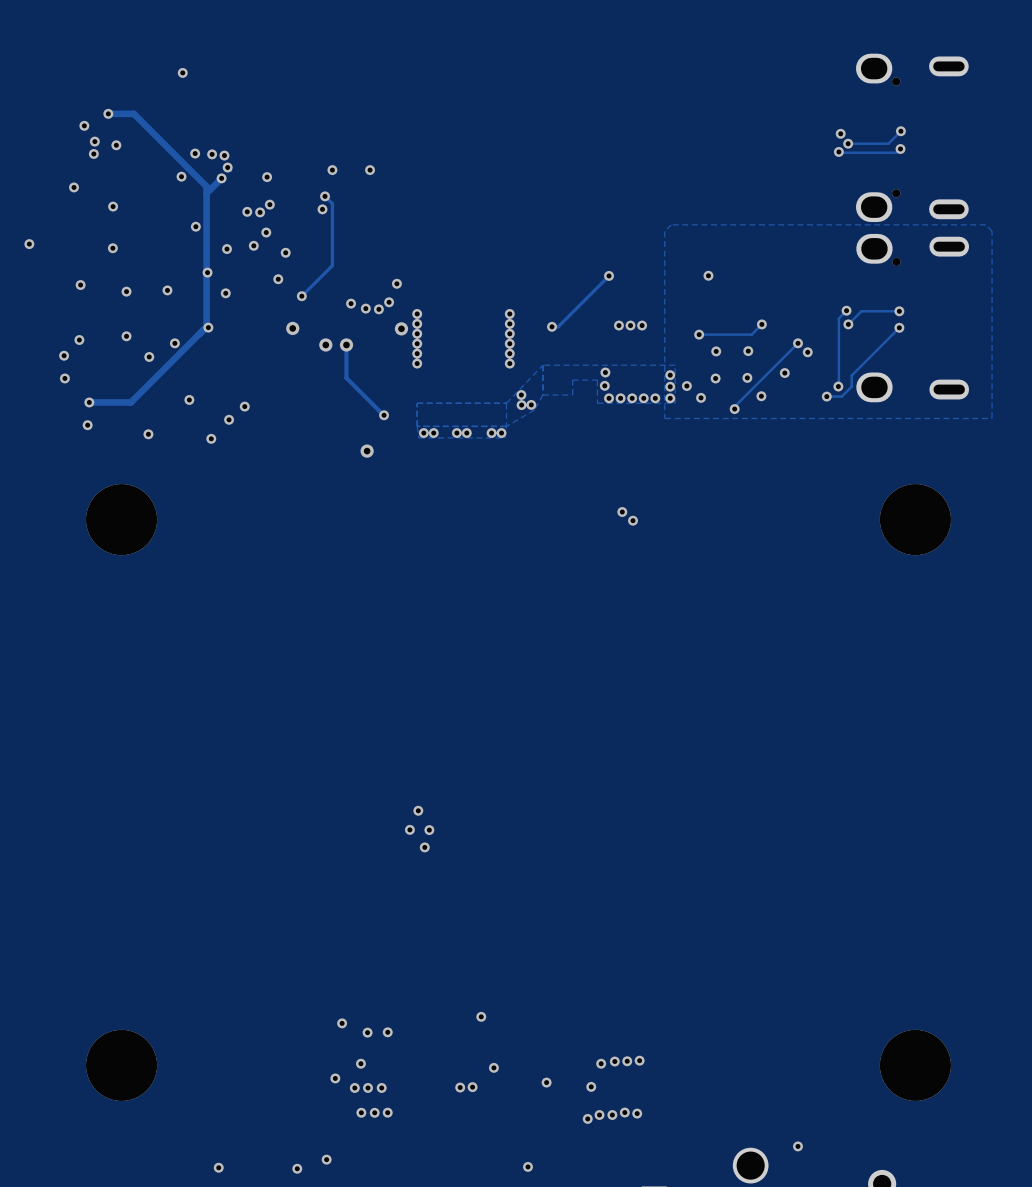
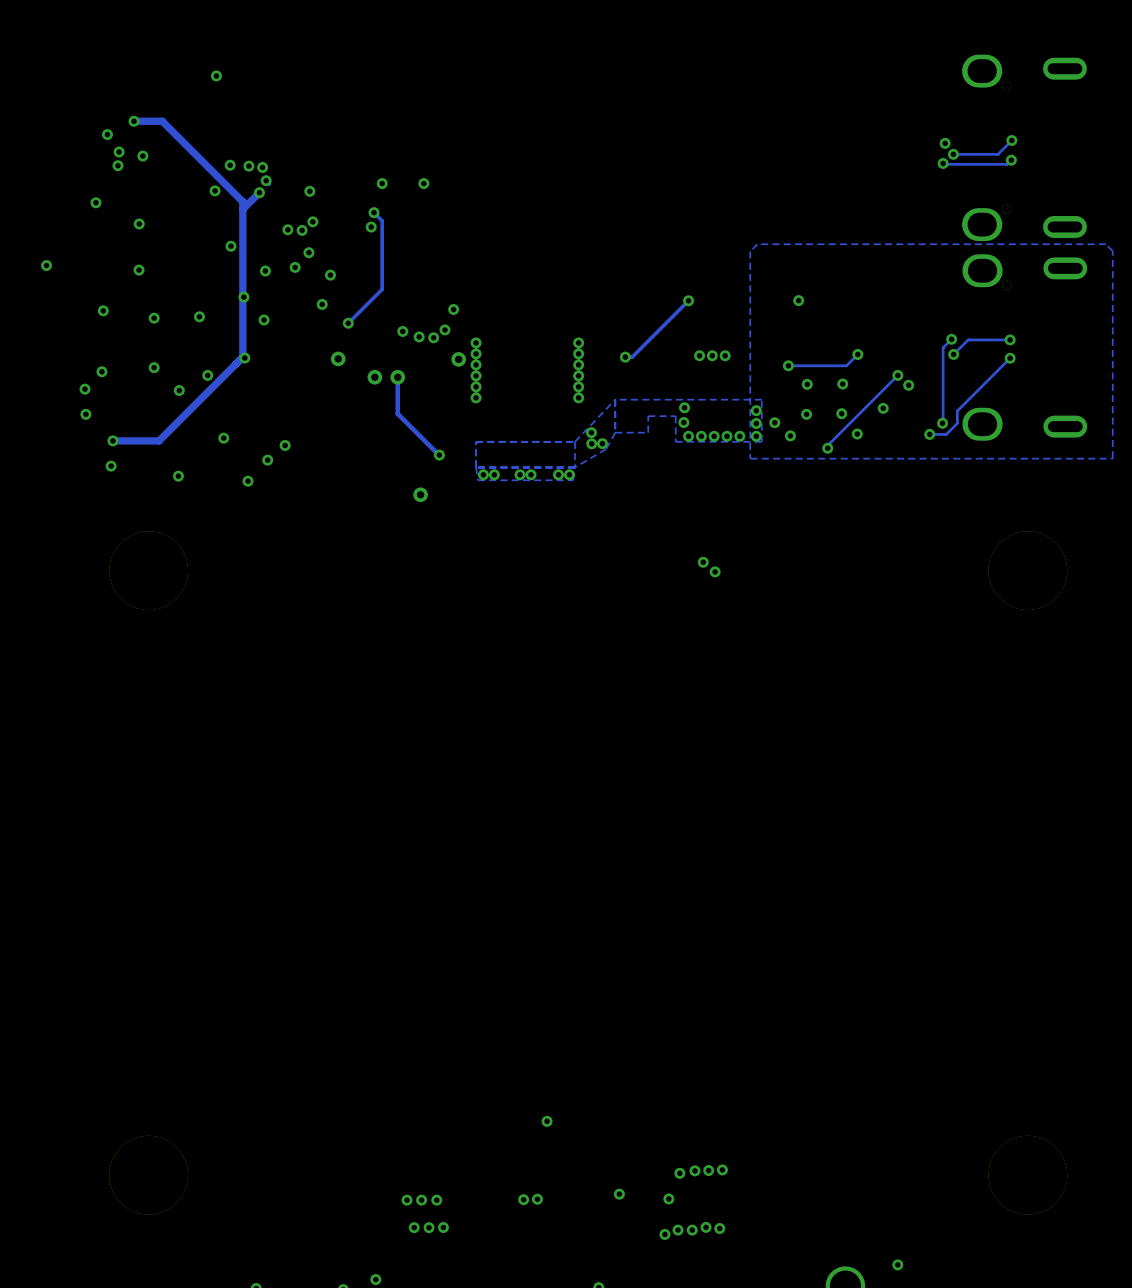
via: (418, 810) -> none
via: (409, 829) -> none
via: (429, 830) -> none
via: (424, 847) -> none
via: (342, 1023) -> none
via: (367, 1032) -> none
via: (387, 1032) -> none
via: (360, 1063) -> none
via: (493, 1067) -> none
via: (335, 1078) -> none

